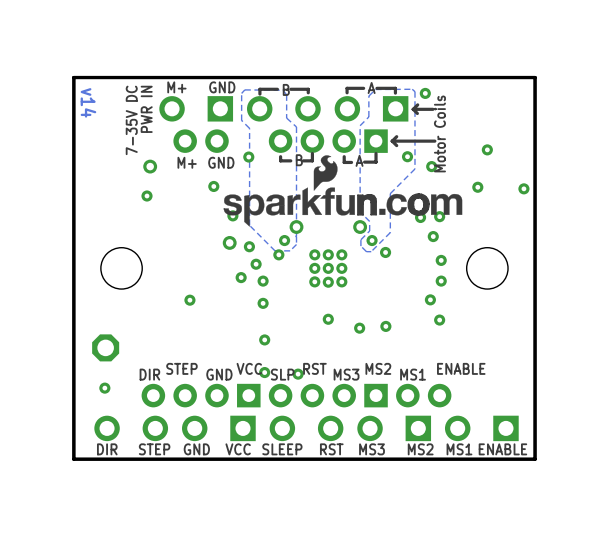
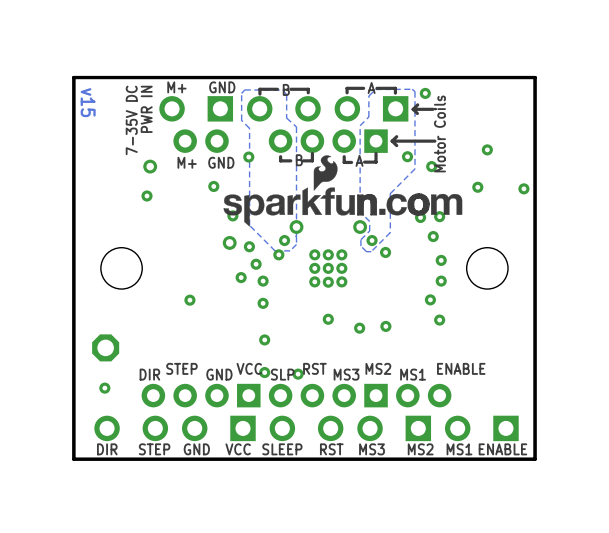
text: v14 (88, 102) -> v15 (88, 102)

